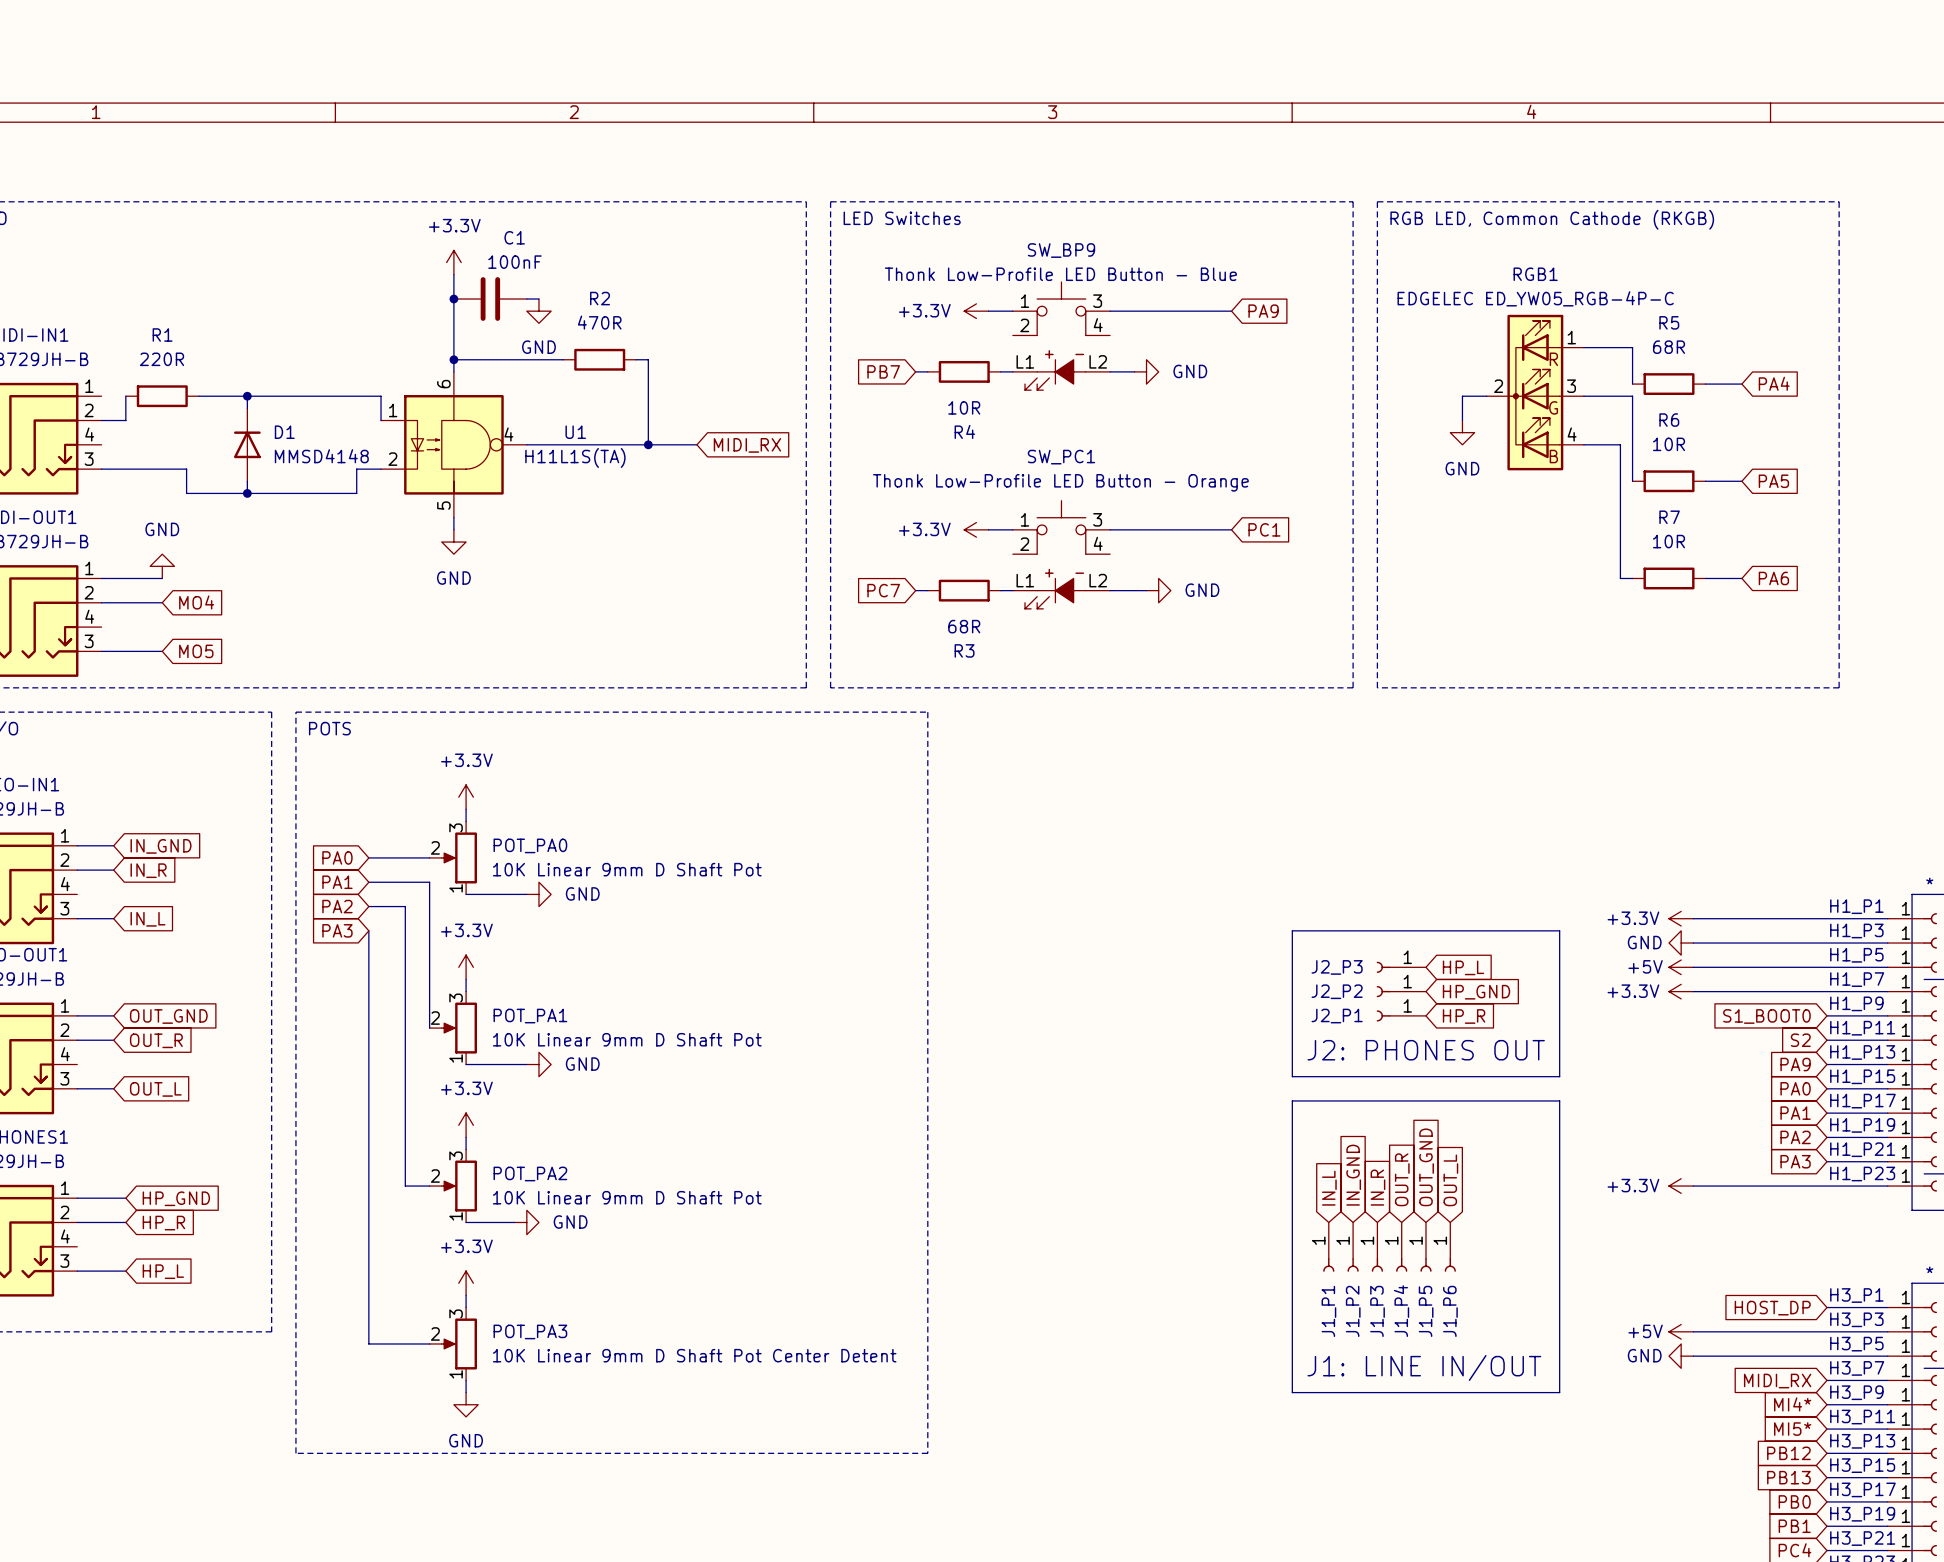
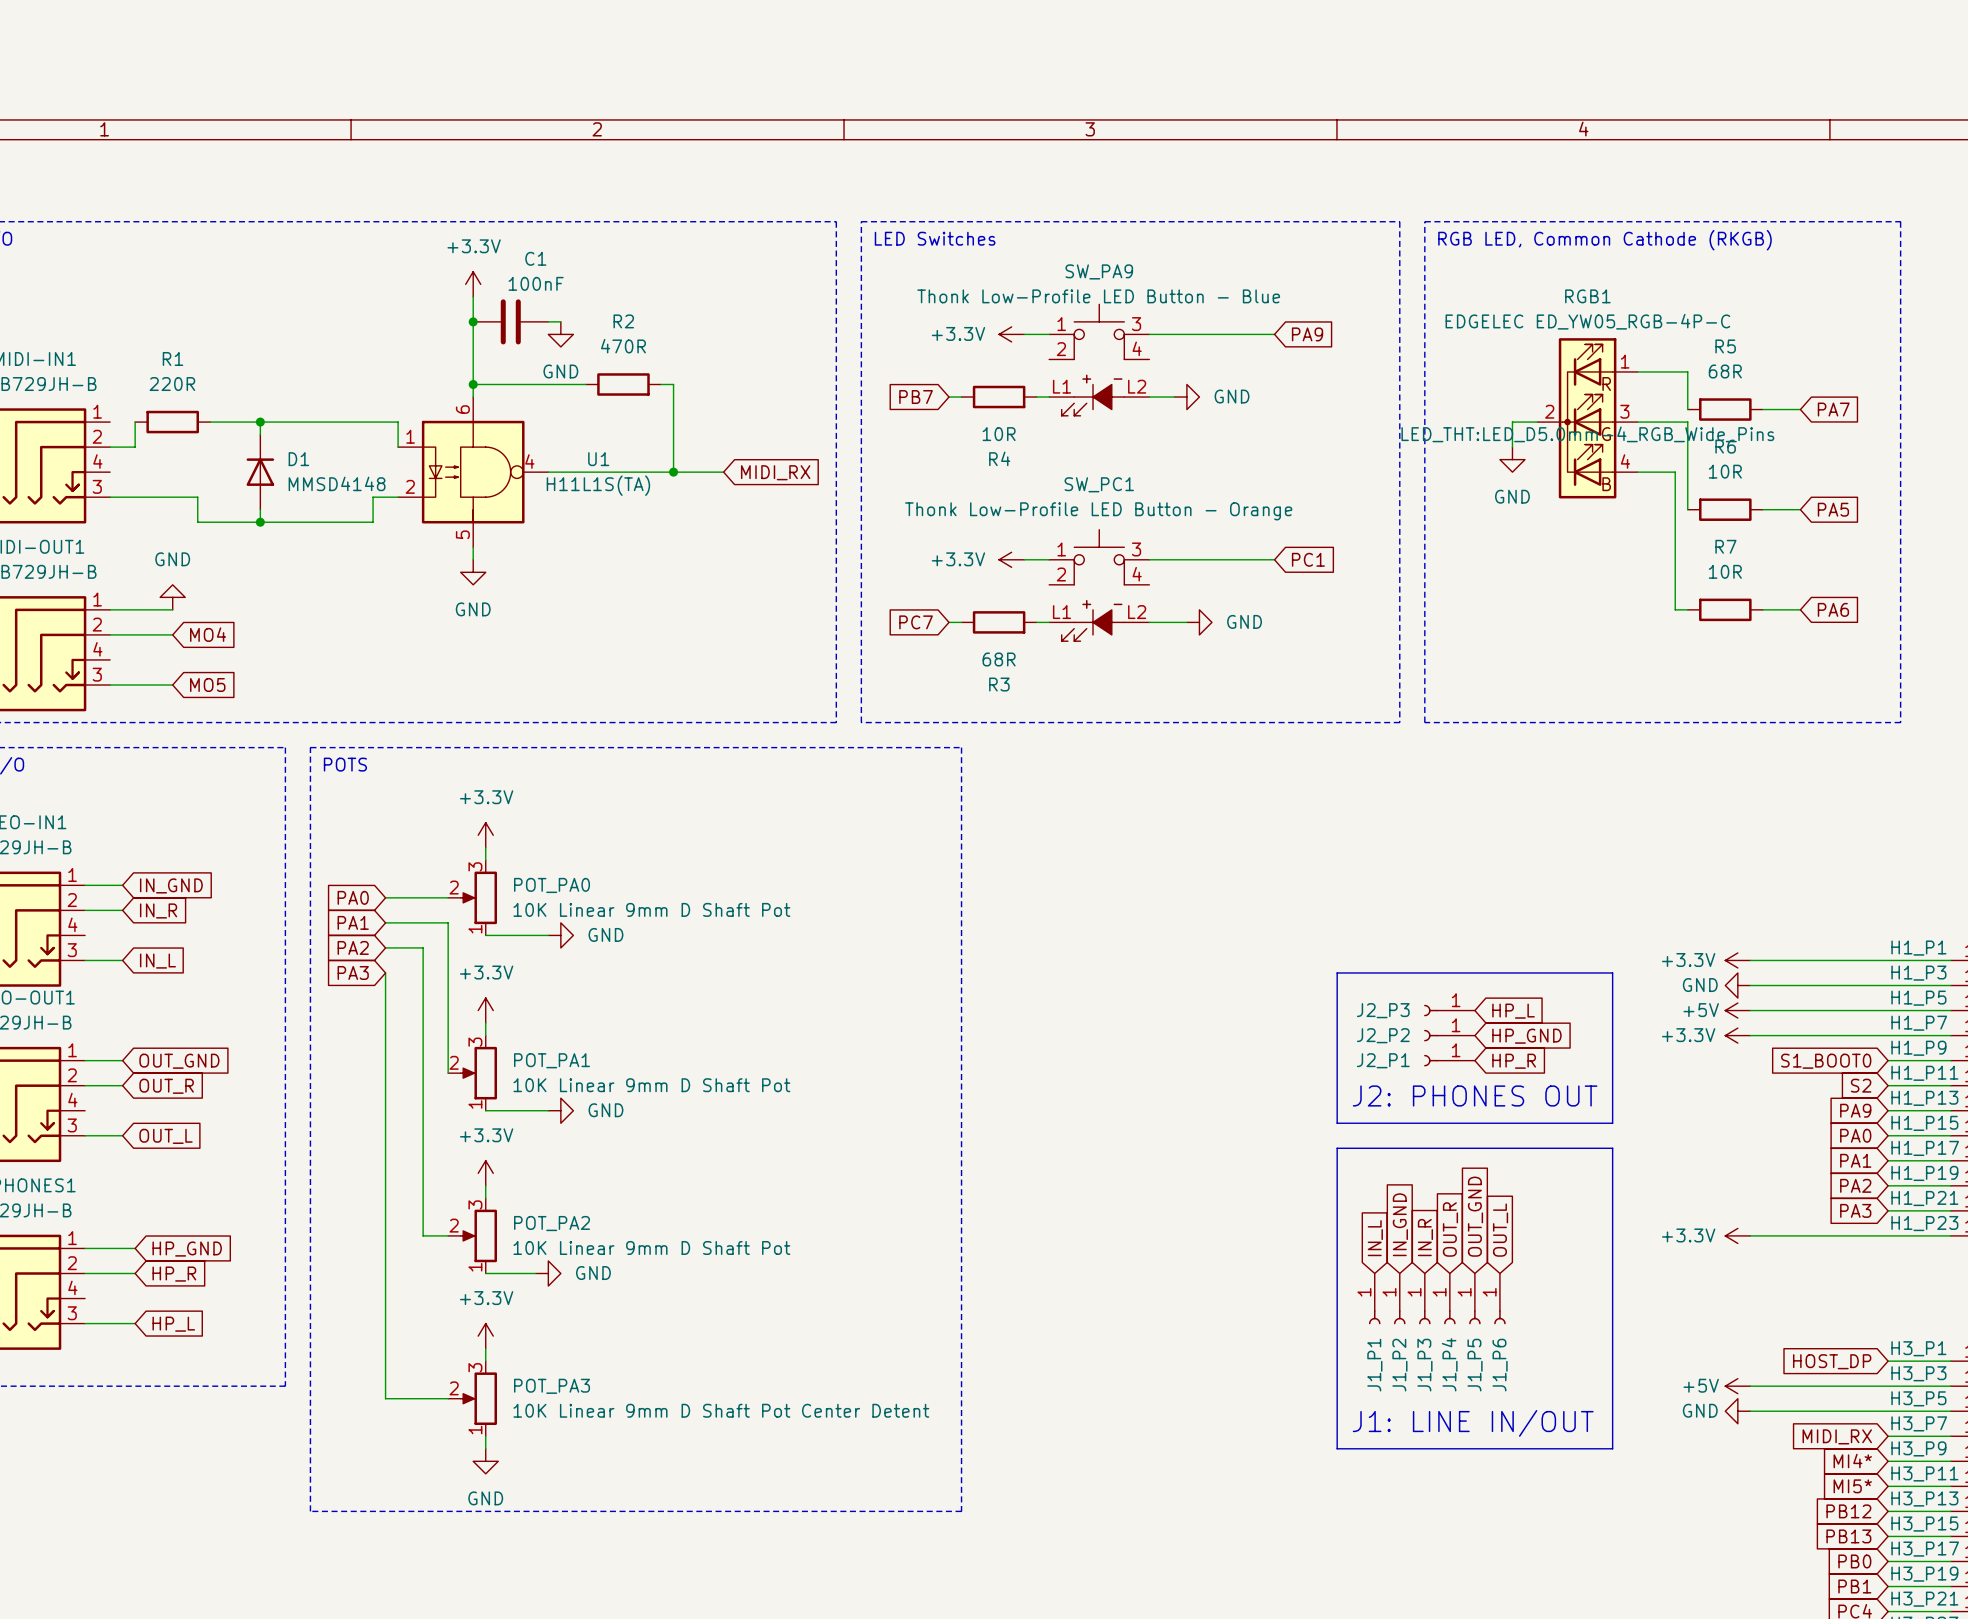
SW_BP9 name: SW_BP9 (1061, 250) -> SW_PA9 (1099, 271)
global label: PA4 (1774, 383) -> PA7 (1833, 409)
RGB1 text: none -> LED_THT:LED_D5.0mm-4_RGB_Wide_Pins (1587, 434)

